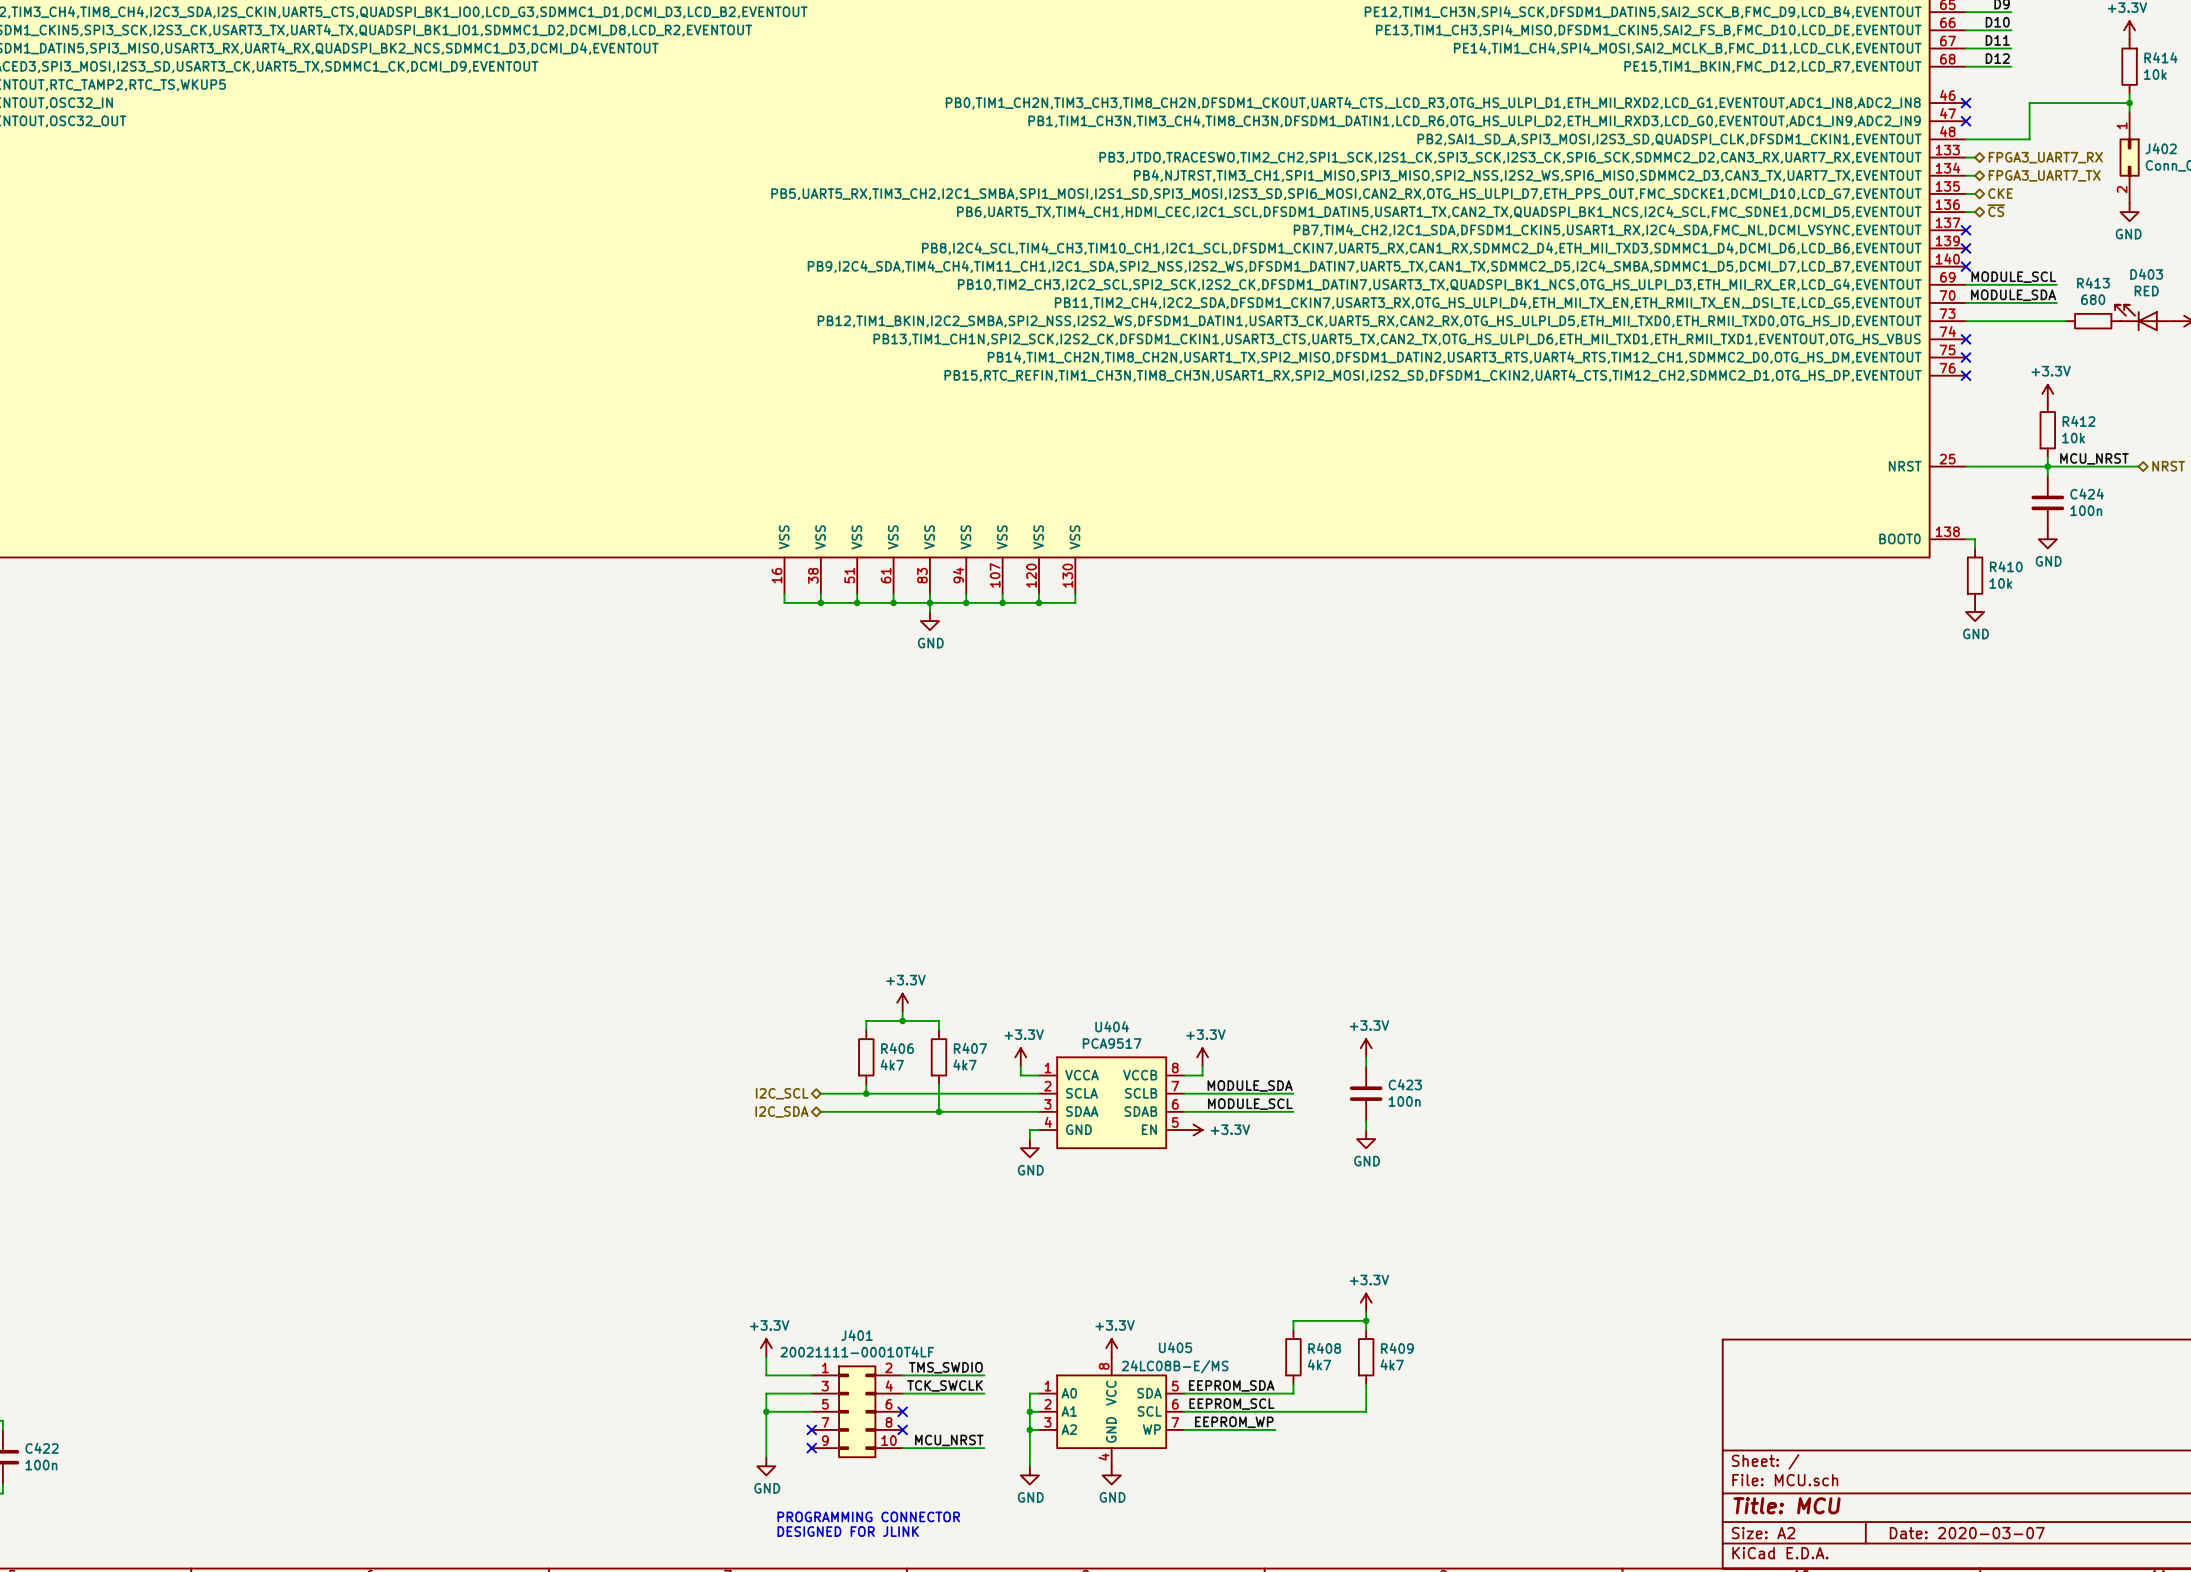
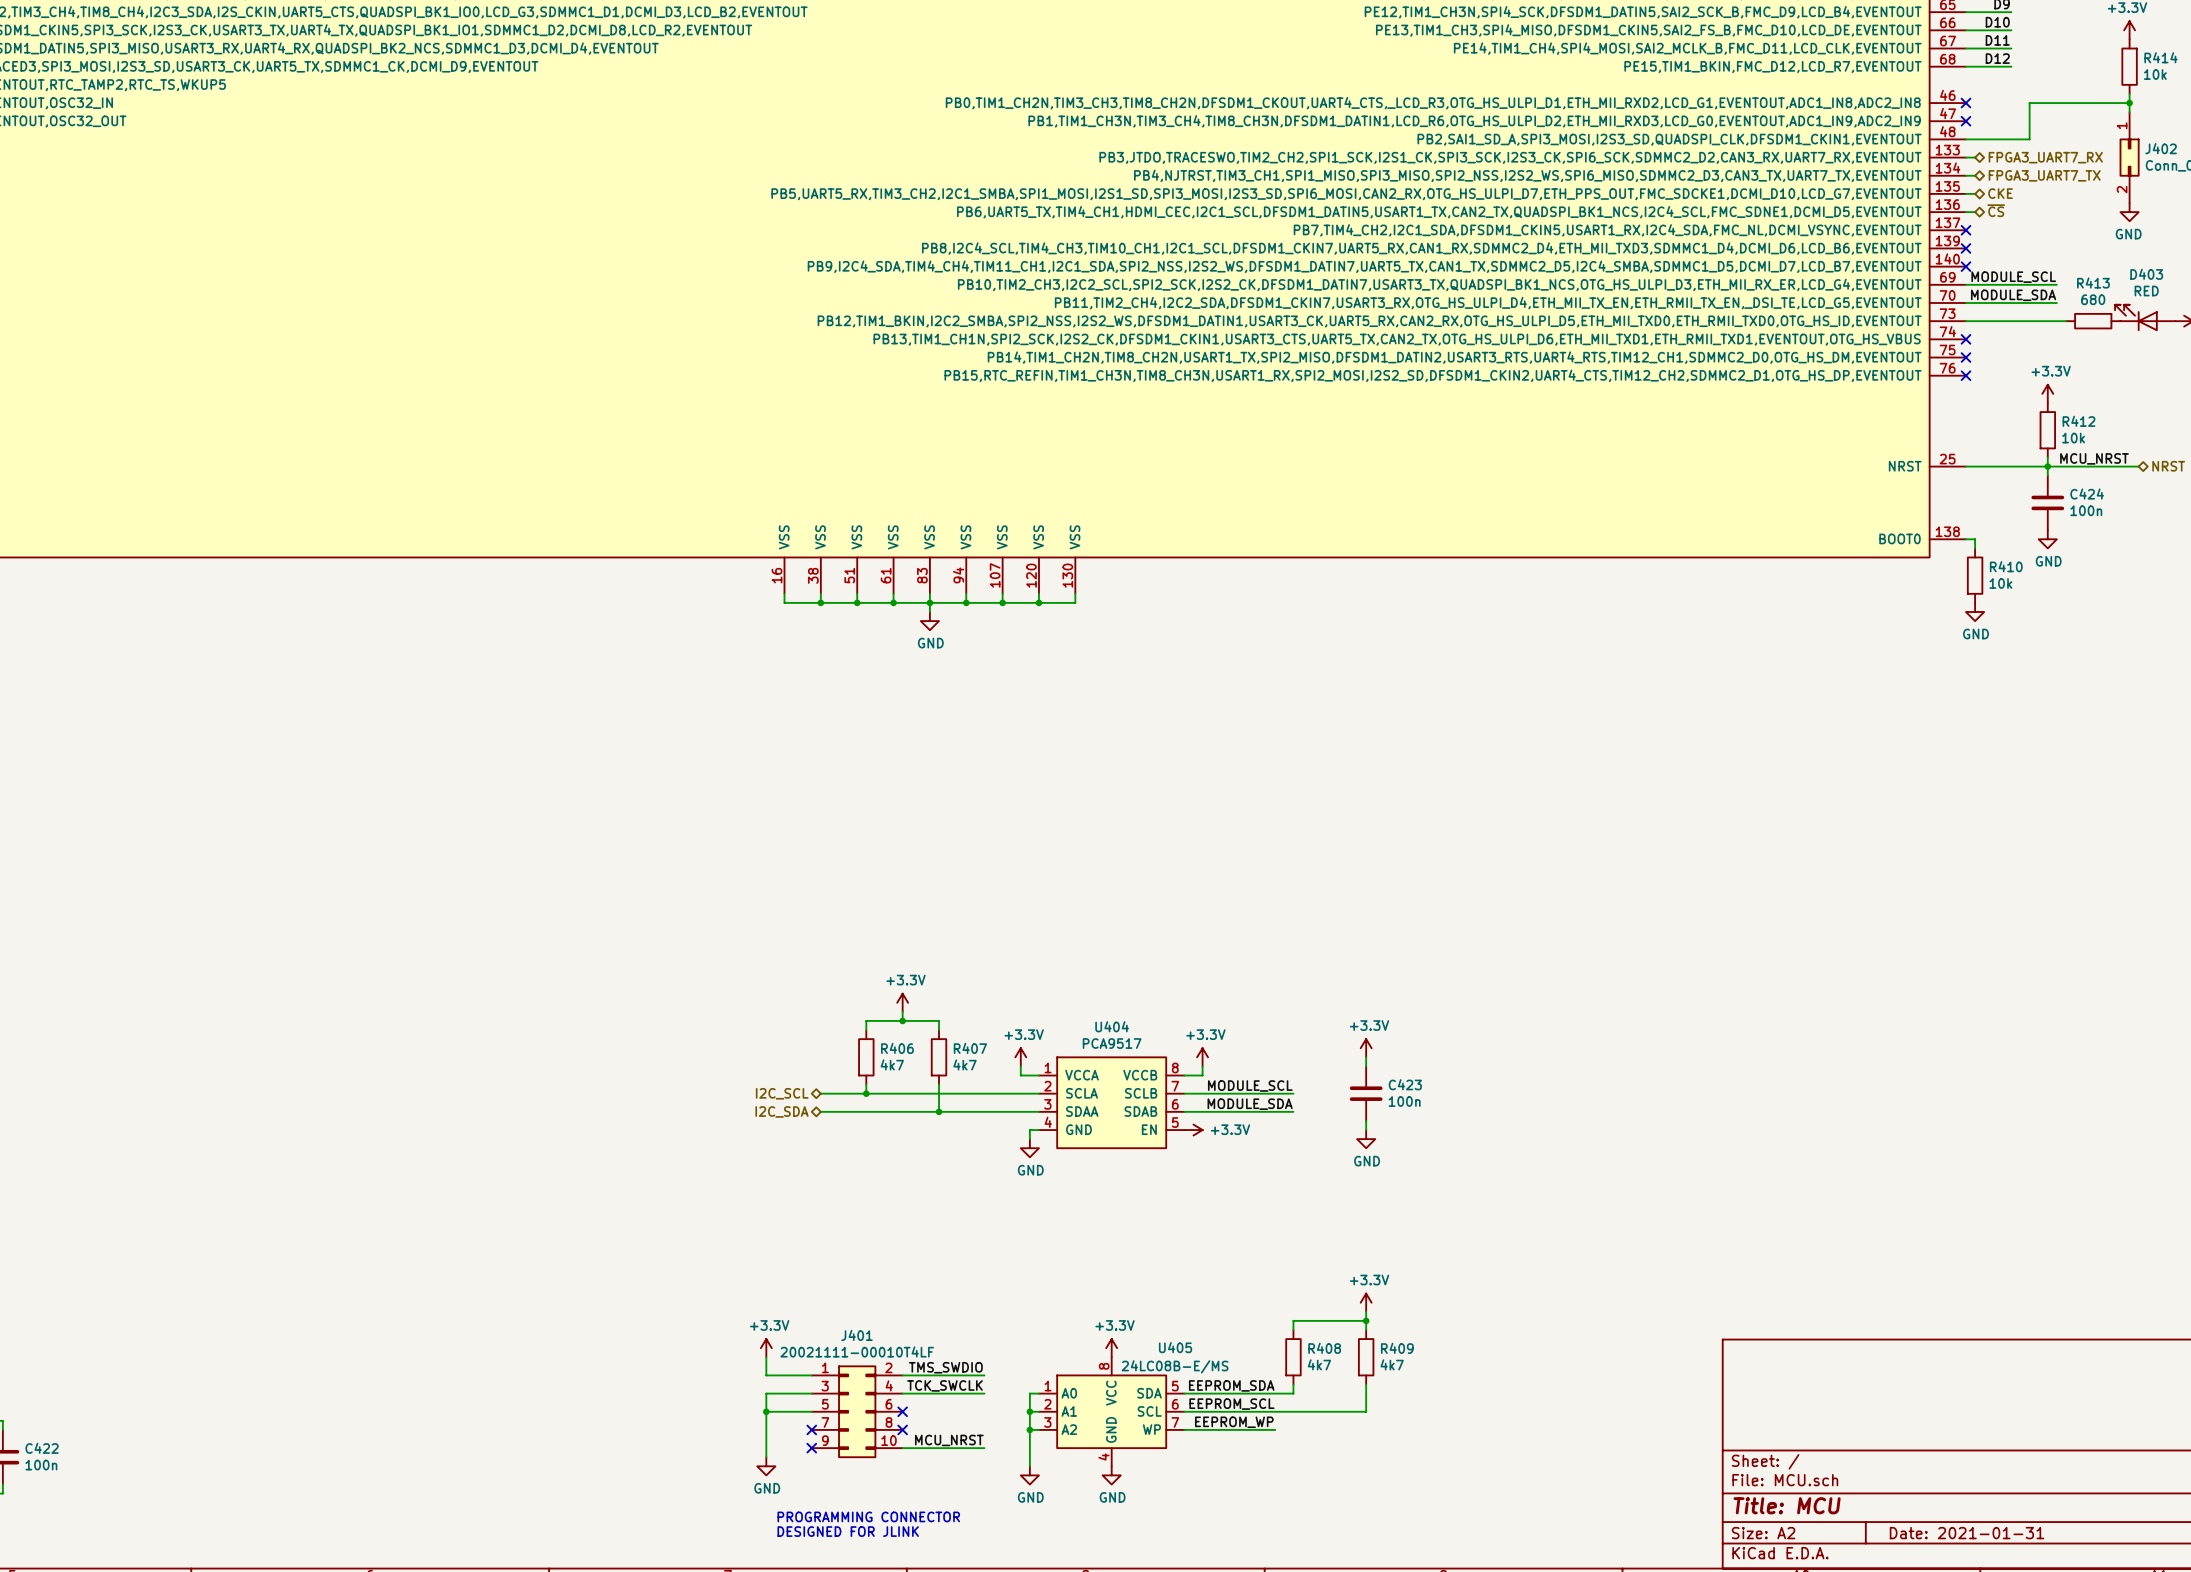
label: MODULE_SDA (1250, 1086) -> MODULE_SCL (1250, 1086)
label: MODULE_SCL (1250, 1104) -> MODULE_SDA (1250, 1104)
title block: Date: 2020-03-07 (1967, 1533) -> Date: 2021-01-31 (1967, 1533)

